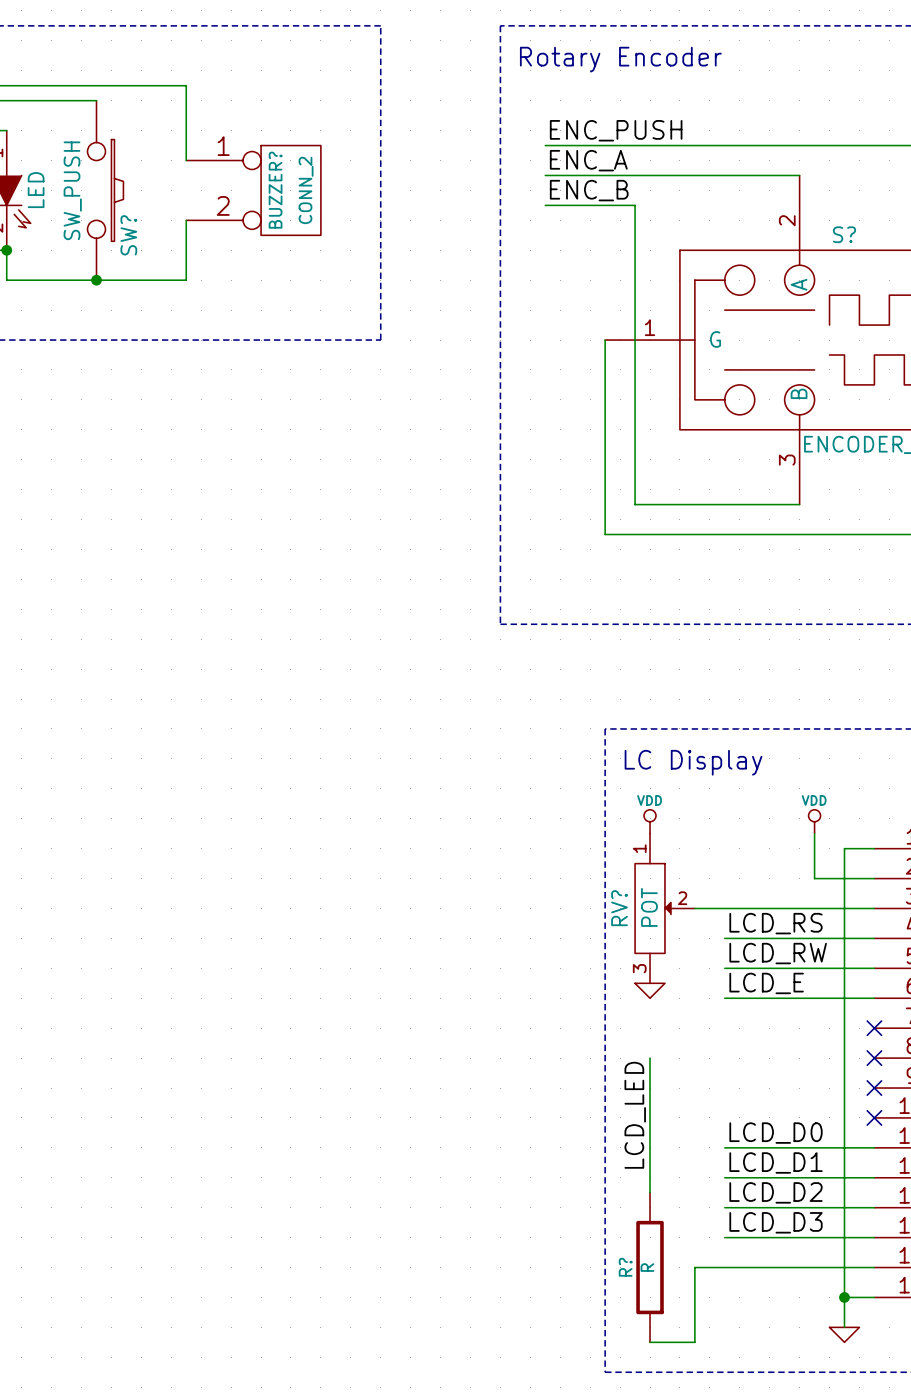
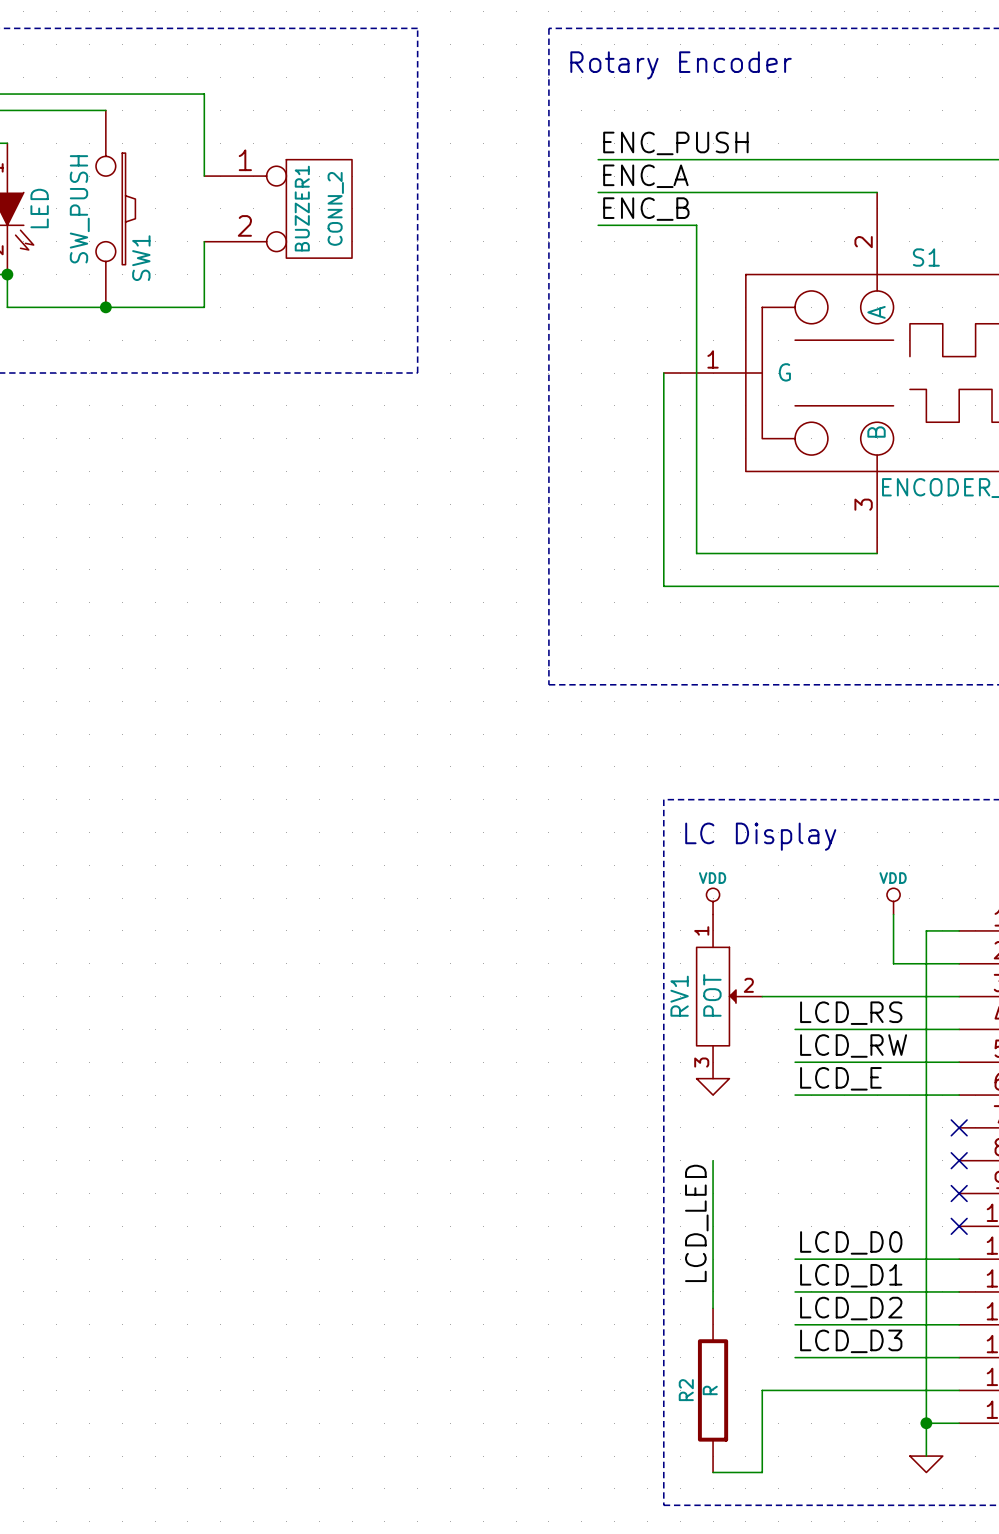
BUZZER? name: BUZZER? (275, 190) -> BUZZER1 (302, 208)
S? name: S? (844, 234) -> S1 (926, 257)
SW? name: SW? (128, 235) -> SW1 (141, 258)
RV? name: RV? (619, 908) -> RV1 (679, 996)
R? name: R? (625, 1267) -> R2 (686, 1390)

